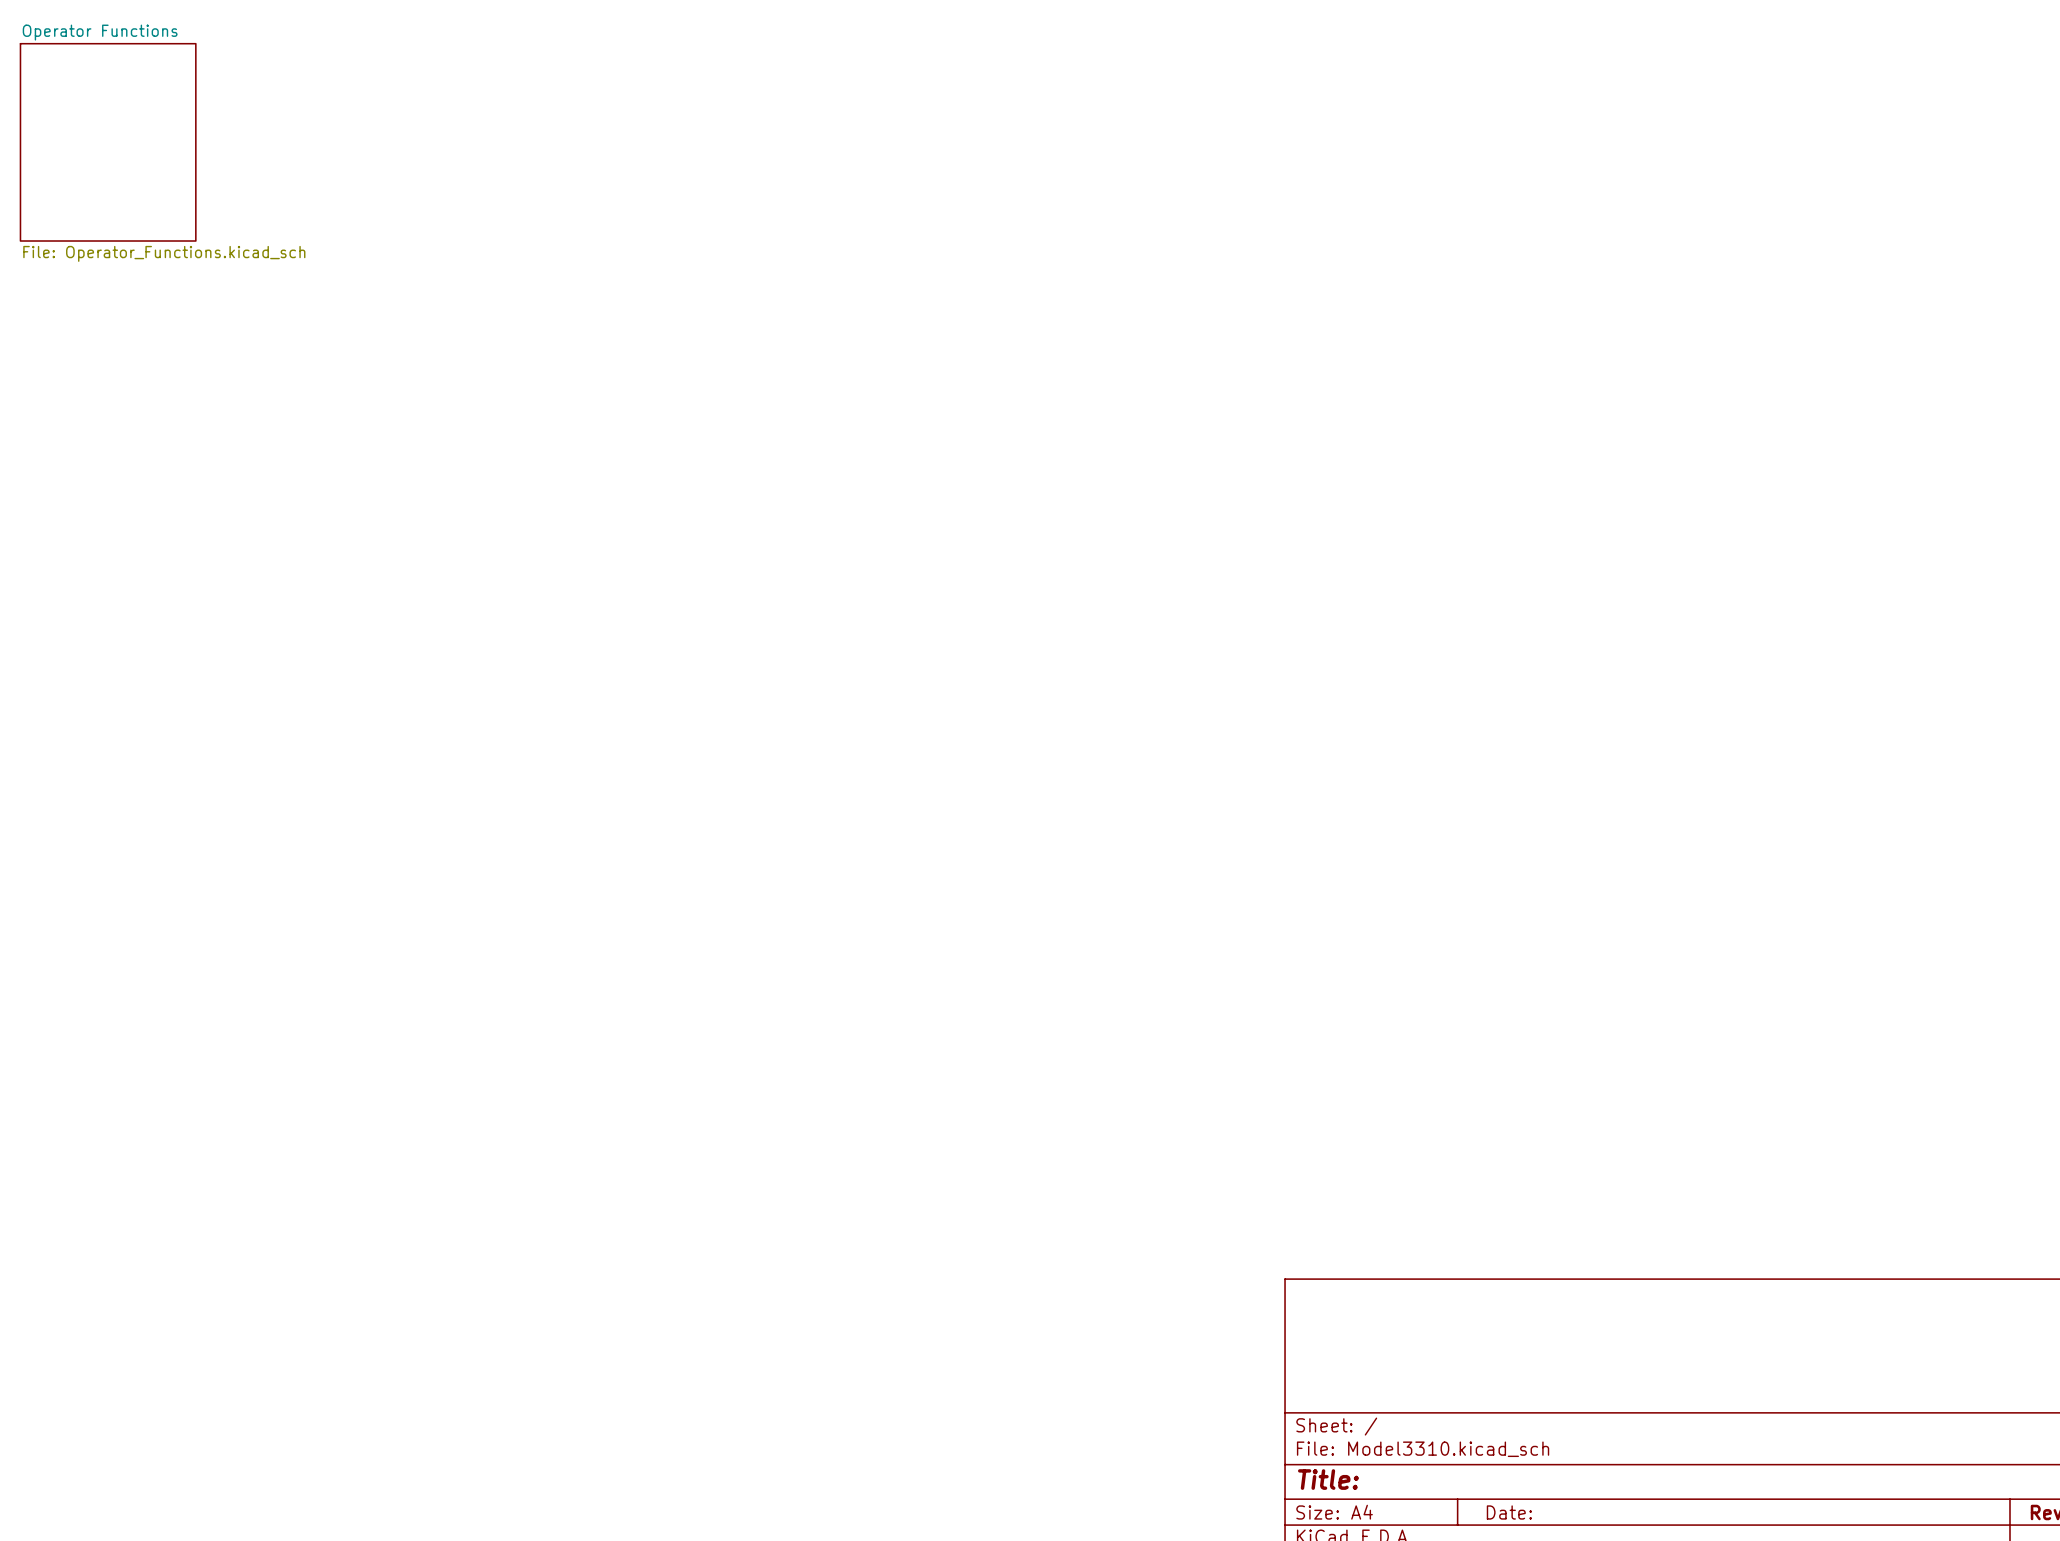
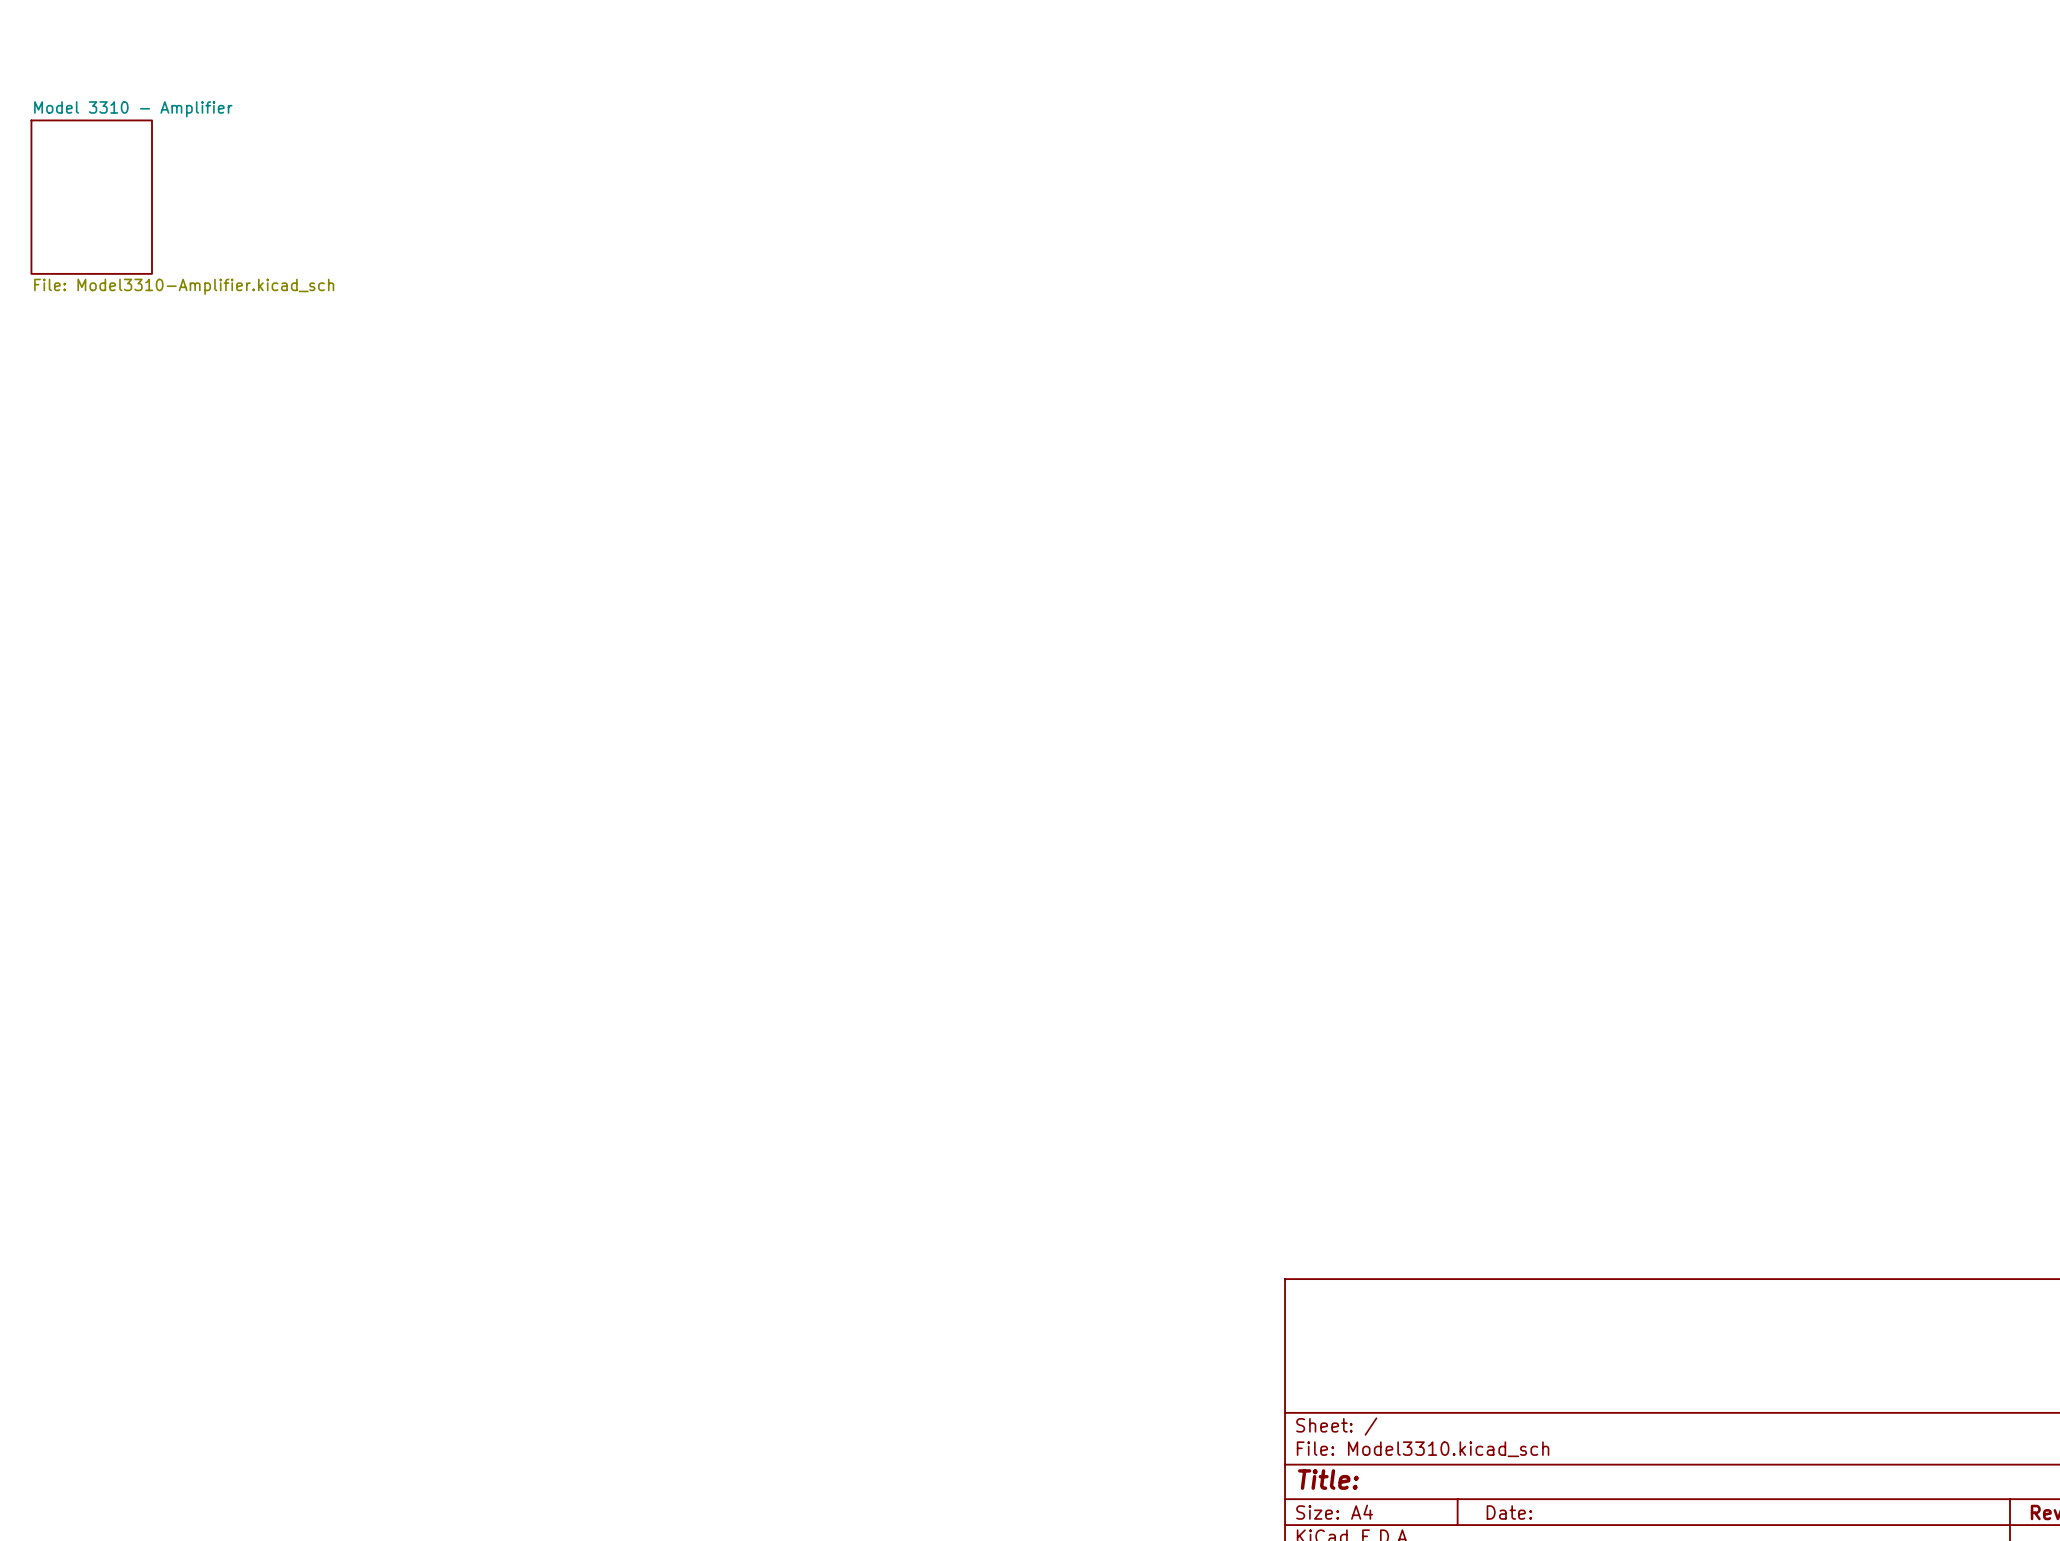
sheet Operator Functions: File: Operator_Functions.kicad_sch (108, 142) -> none
sheet Model 3310 - Amplifier: none -> File: Model3310-Amplifier.kicad_sch (91, 197)

